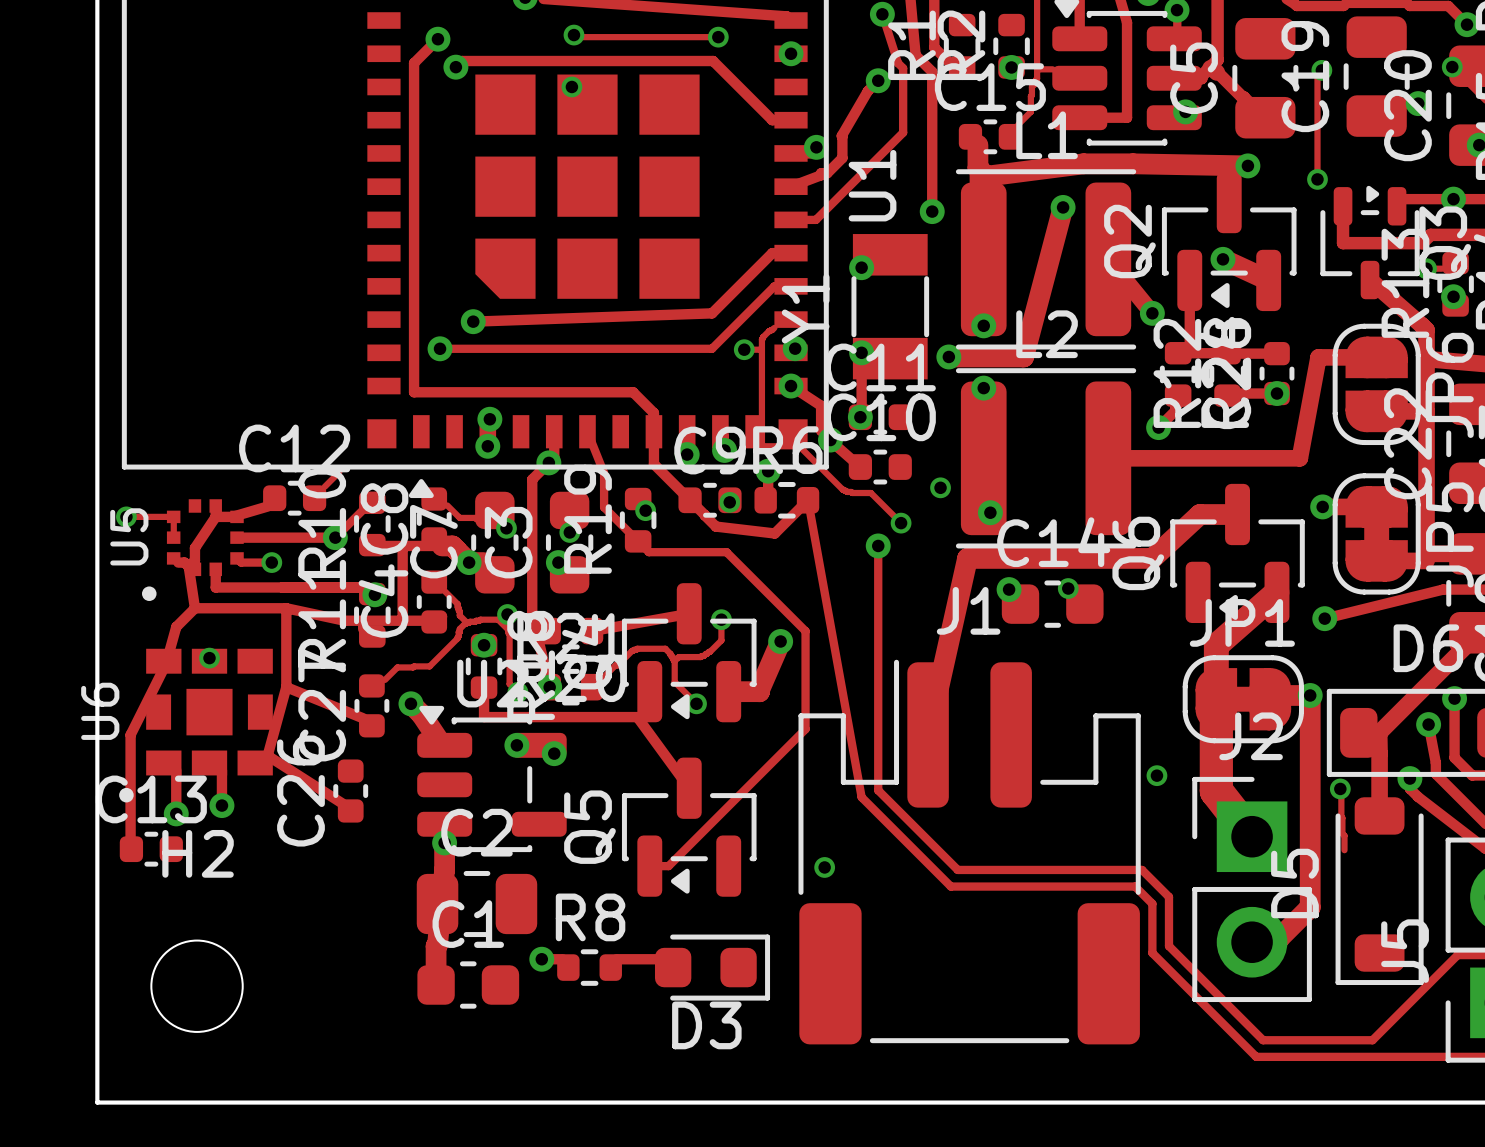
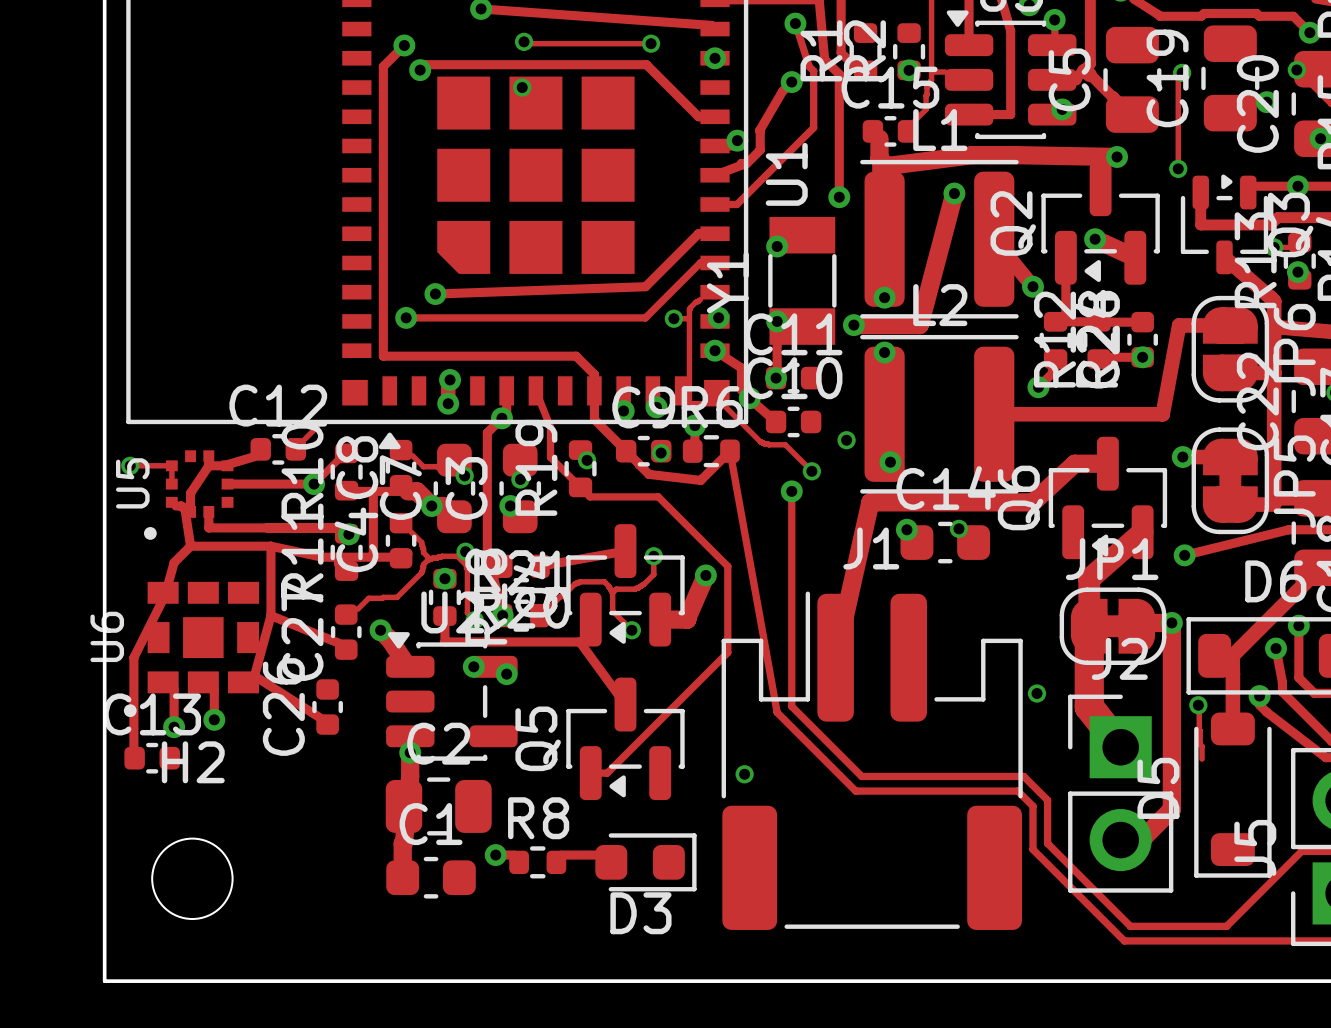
track: (237, 558) (241, 562) (275, 562) -> none
via: (271, 562) -> none
via: (209, 658) -> none

